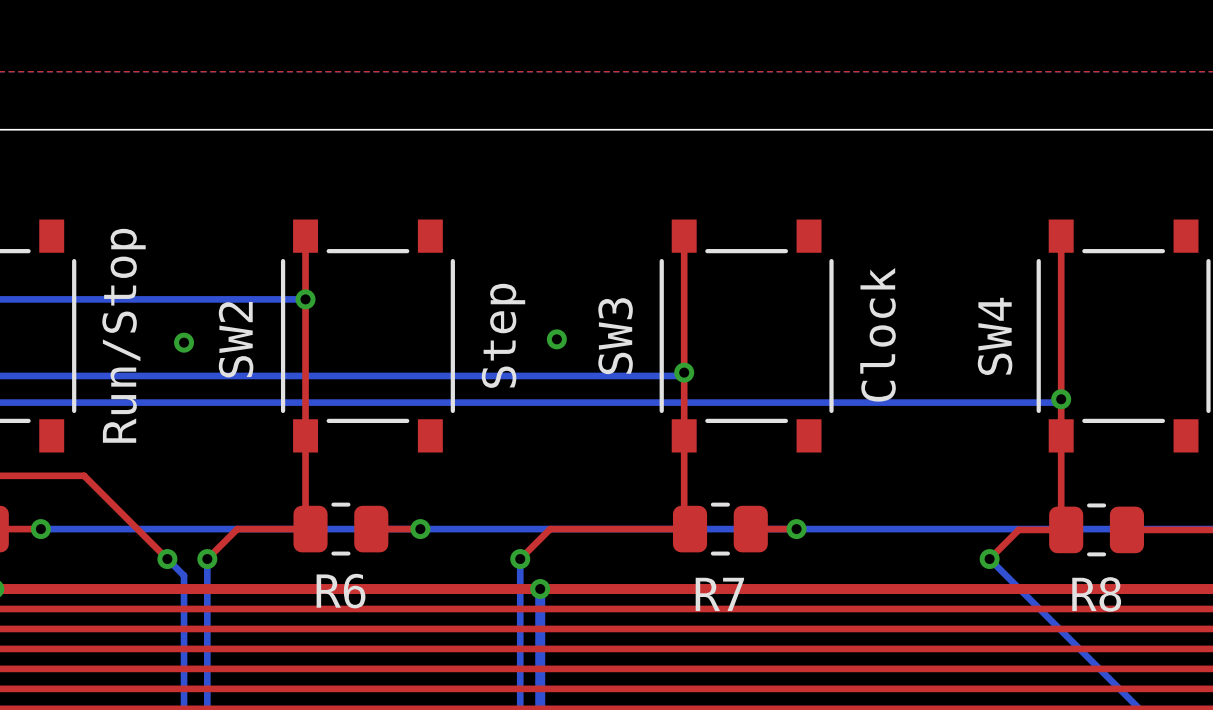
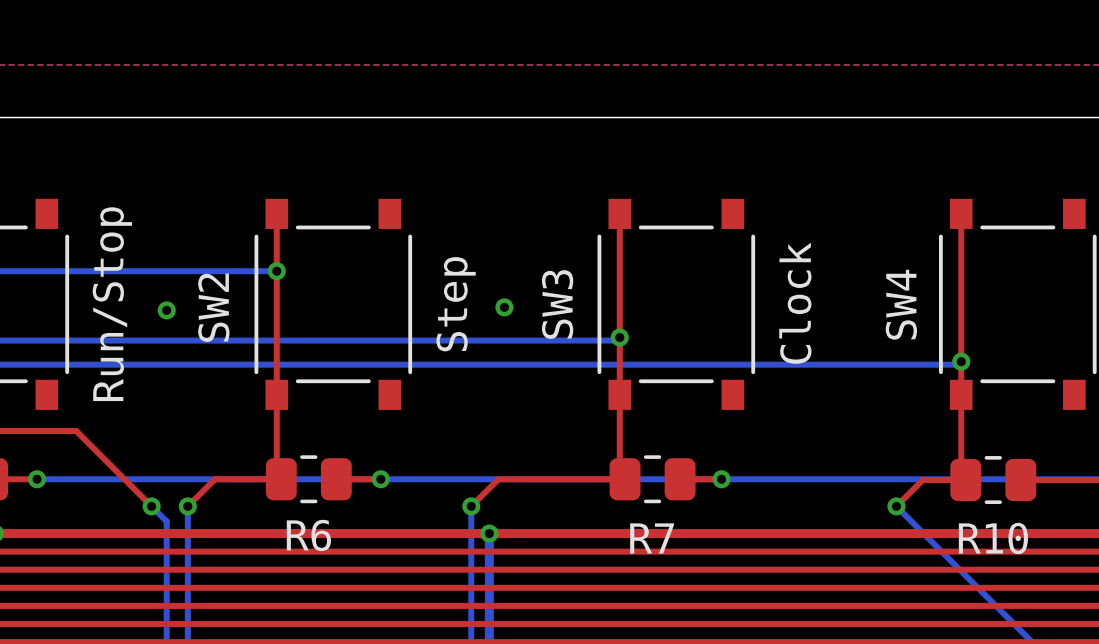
R8 name: R8 (1096, 594) -> R10 (993, 538)

